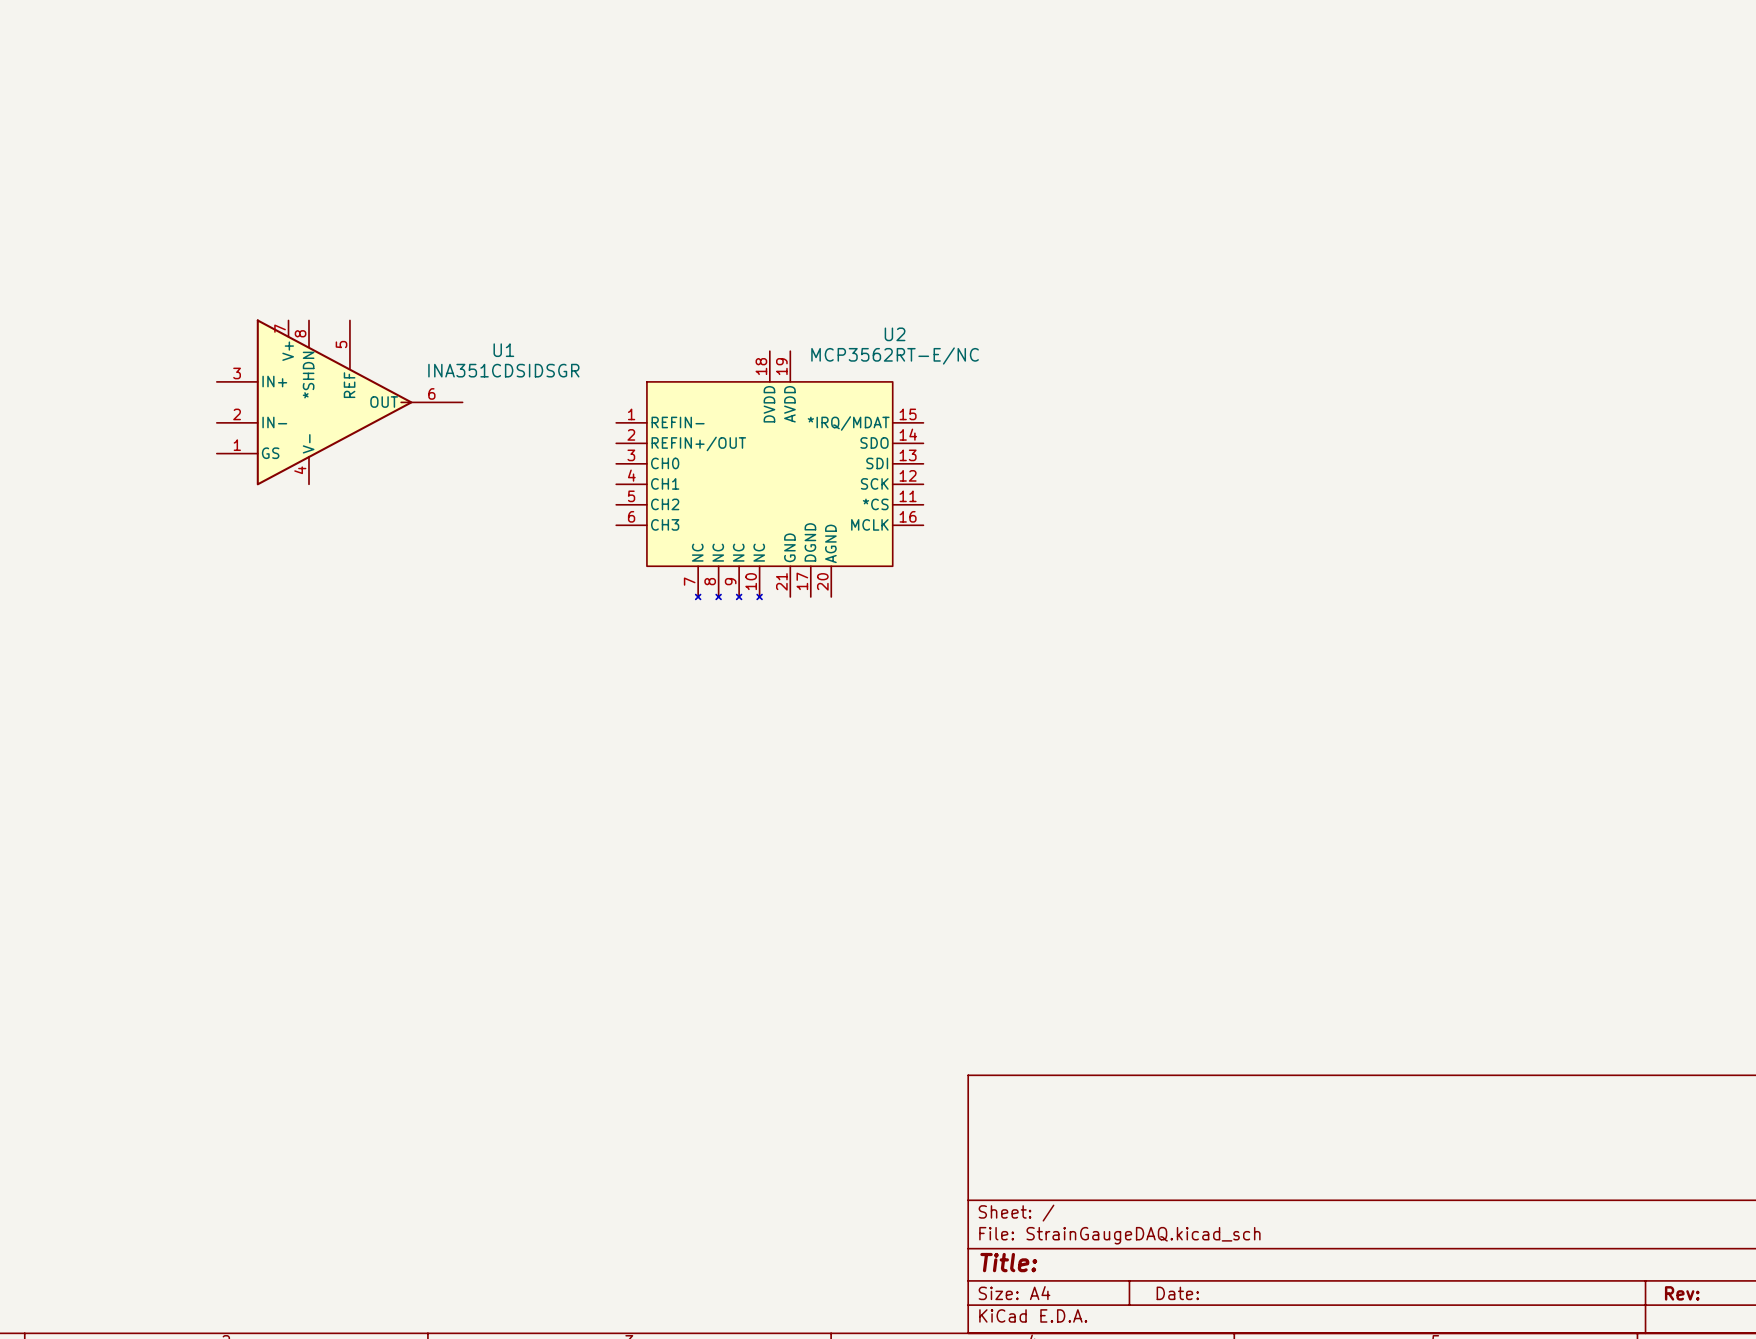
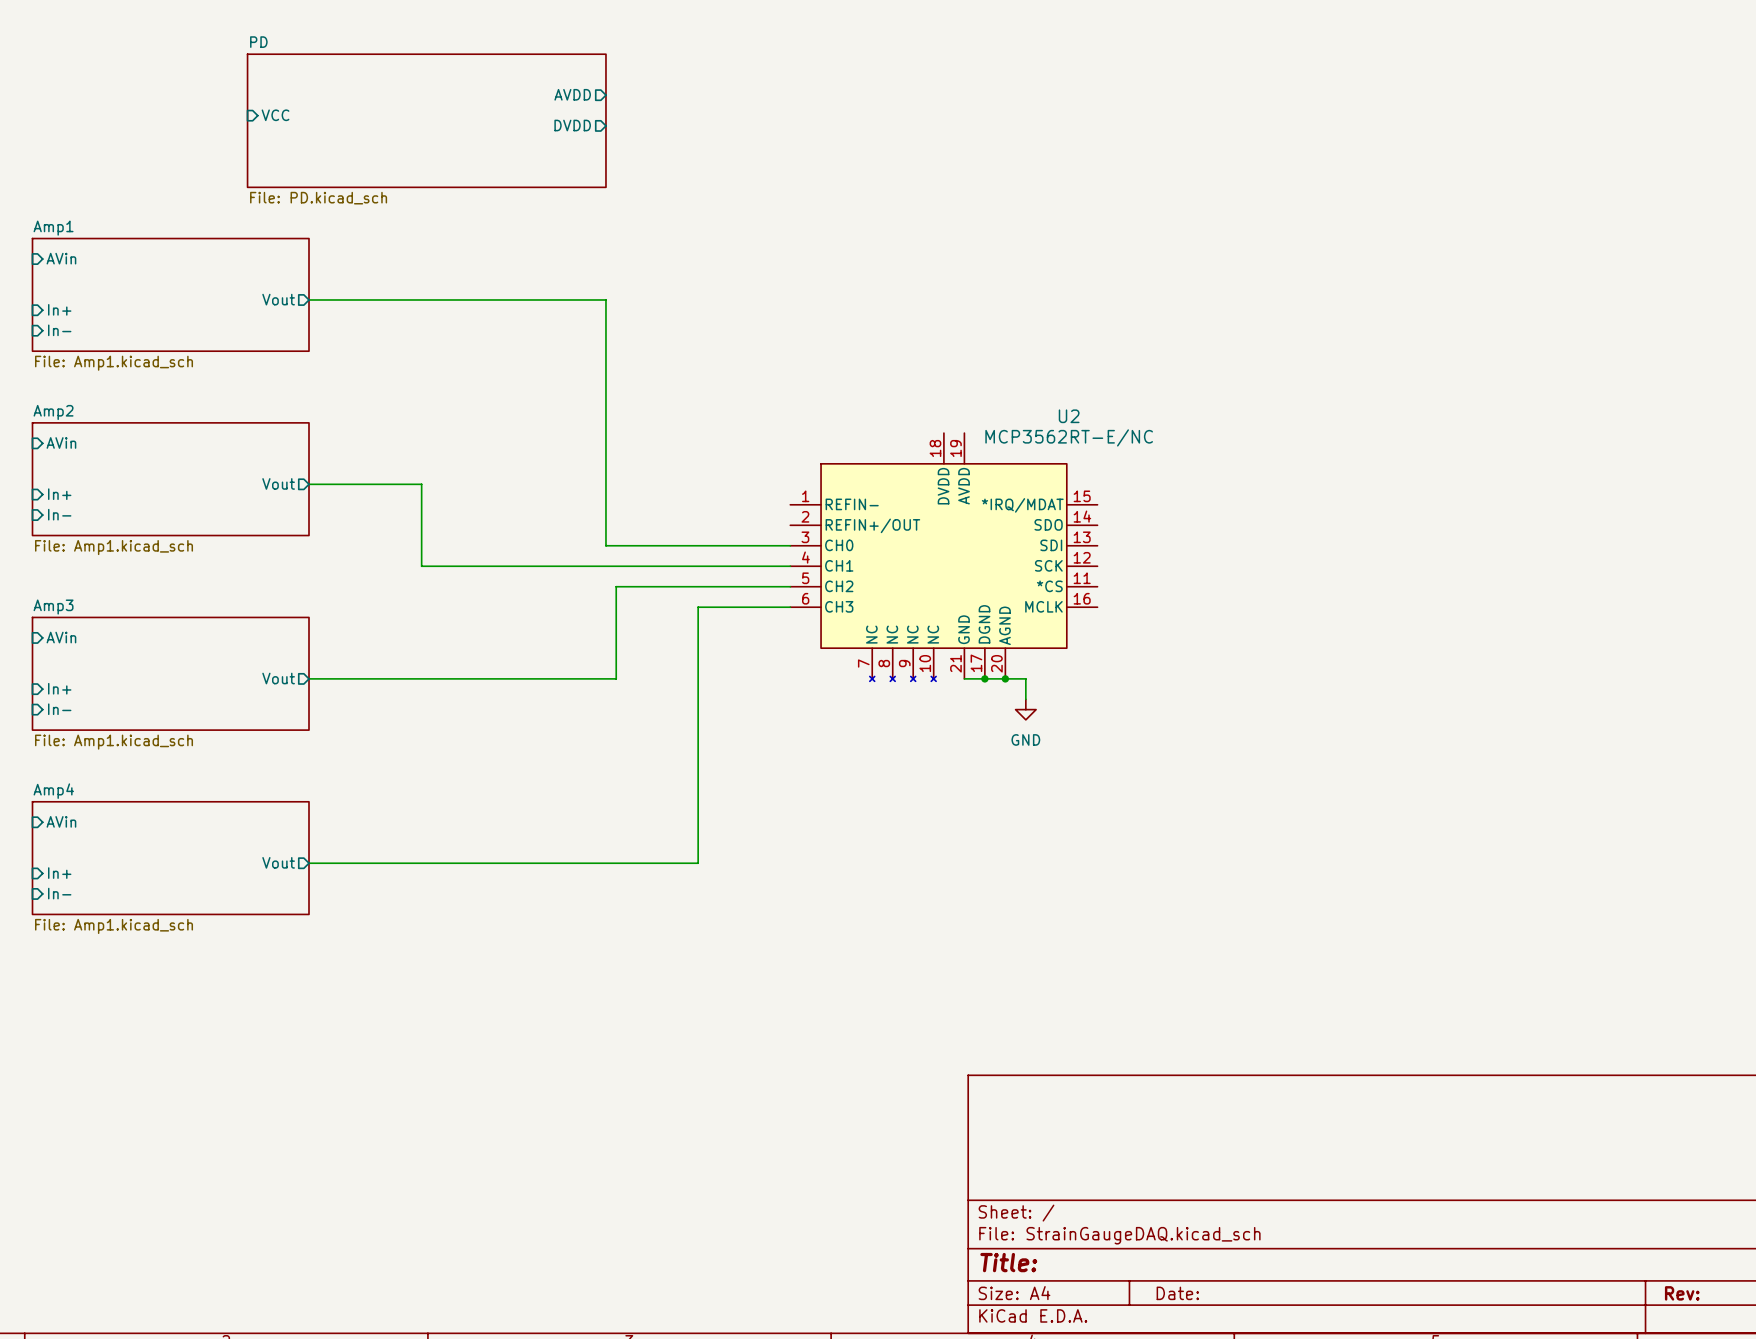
sheet pin: none -> AVDD (572, 94)
sheet pin: none -> VCC (275, 115)
sheet PD: none -> File: PD.kicad_sch (426, 120)
sheet pin: none -> DVDD (572, 125)
sheet pin: none -> AVin (61, 258)
sheet Amp1: none -> File: Amp1.kicad_sch (170, 294)
sheet pin: none -> Vout (278, 299)
wire: none -> (309, 299) (605, 299) (605, 545) (790, 545)
sheet pin: none -> In+ (59, 309)
sheet pin: none -> In- (59, 330)
U1: INA351CDSIDSGR (339, 402) -> none
sheet pin: none -> AVin (61, 442)
U2 position: (769, 475) -> (943, 557)
sheet Amp2: none -> File: Amp1.kicad_sch (170, 479)
sheet pin: none -> Vout (278, 483)
wire: none -> (309, 484) (421, 484) (421, 566) (790, 566)
sheet pin: none -> In+ (59, 494)
sheet pin: none -> In- (59, 514)
wire: none -> (790, 586) (616, 586) (616, 678) (309, 678)
wire: none -> (790, 607) (698, 607) (698, 863) (309, 863)
sheet pin: none -> AVin (61, 637)
sheet Amp3: none -> File: Amp1.kicad_sch (170, 673)
sheet pin: none -> Vout (278, 678)
wire: none -> (964, 678) (1025, 678) (1025, 699)
junction: none -> (984, 678)
junction: none -> (1005, 678)
sheet pin: none -> In+ (59, 688)
sheet pin: none -> In- (59, 709)
power symbol: none -> GND (1025, 709)
sheet pin: none -> AVin (61, 821)
sheet Amp4: none -> File: Amp1.kicad_sch (170, 858)
sheet pin: none -> Vout (278, 862)
sheet pin: none -> In+ (59, 873)
sheet pin: none -> In- (59, 893)

